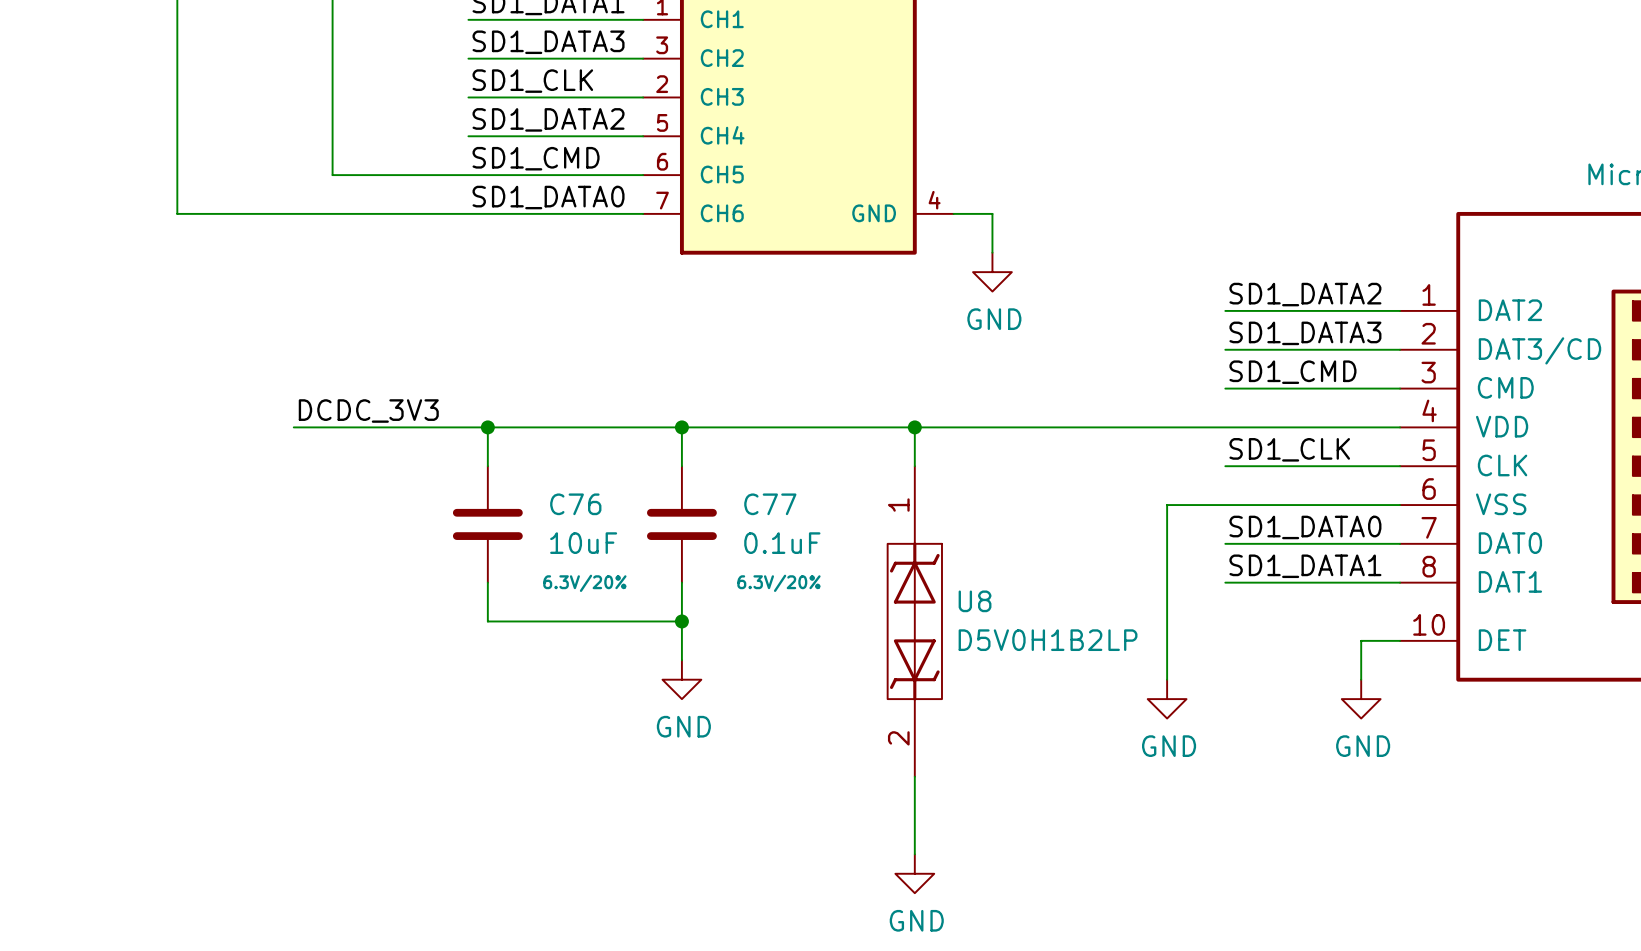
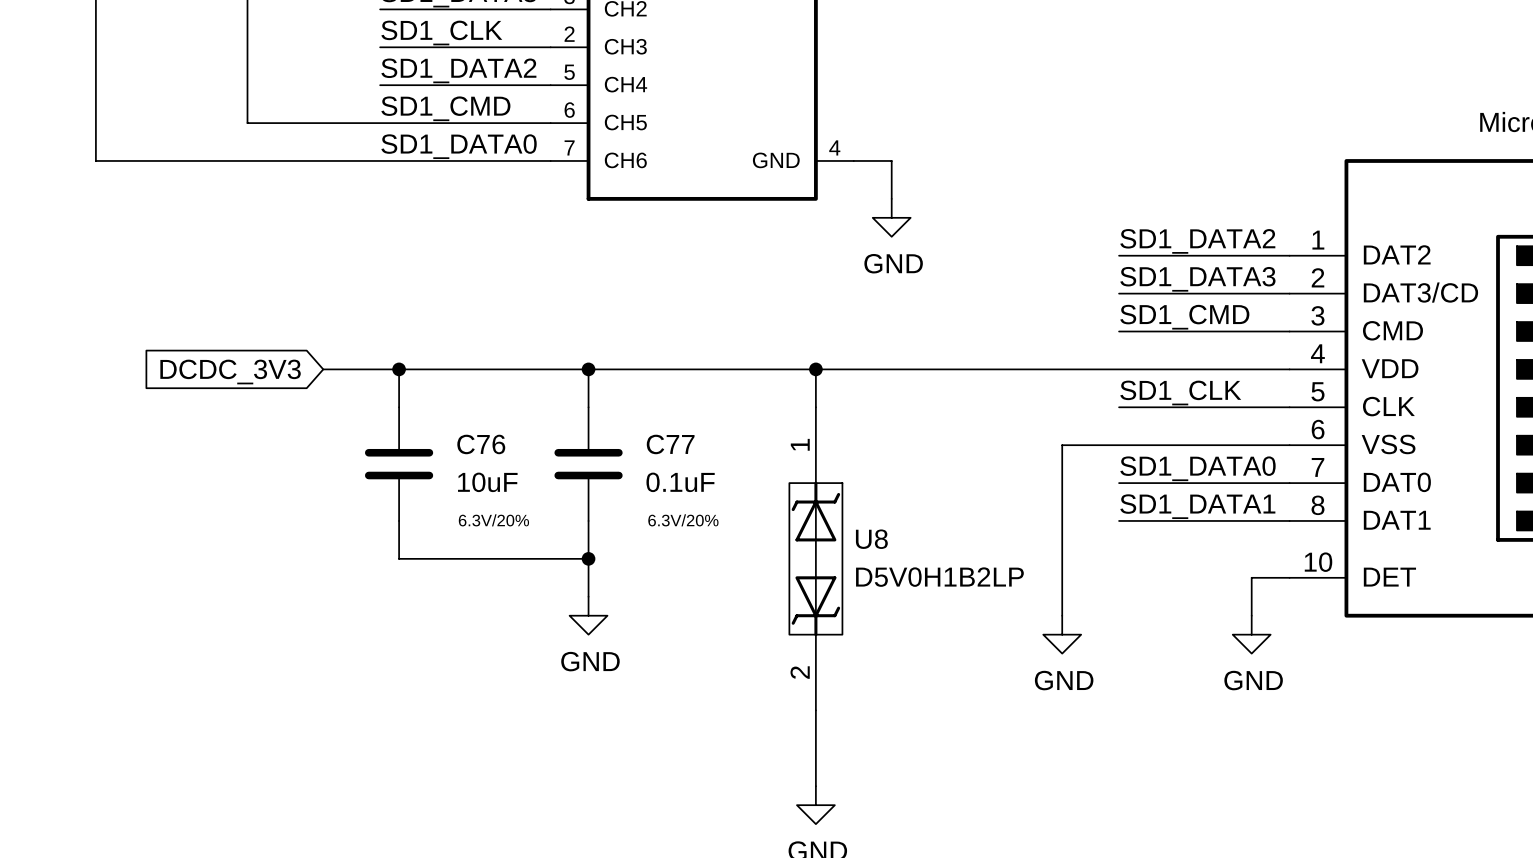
label: DCDC_3V3 (368, 411) -> none
wire: (293, 427) (410, 427) -> none
global label: none -> DCDC_3V3 (230, 371)

